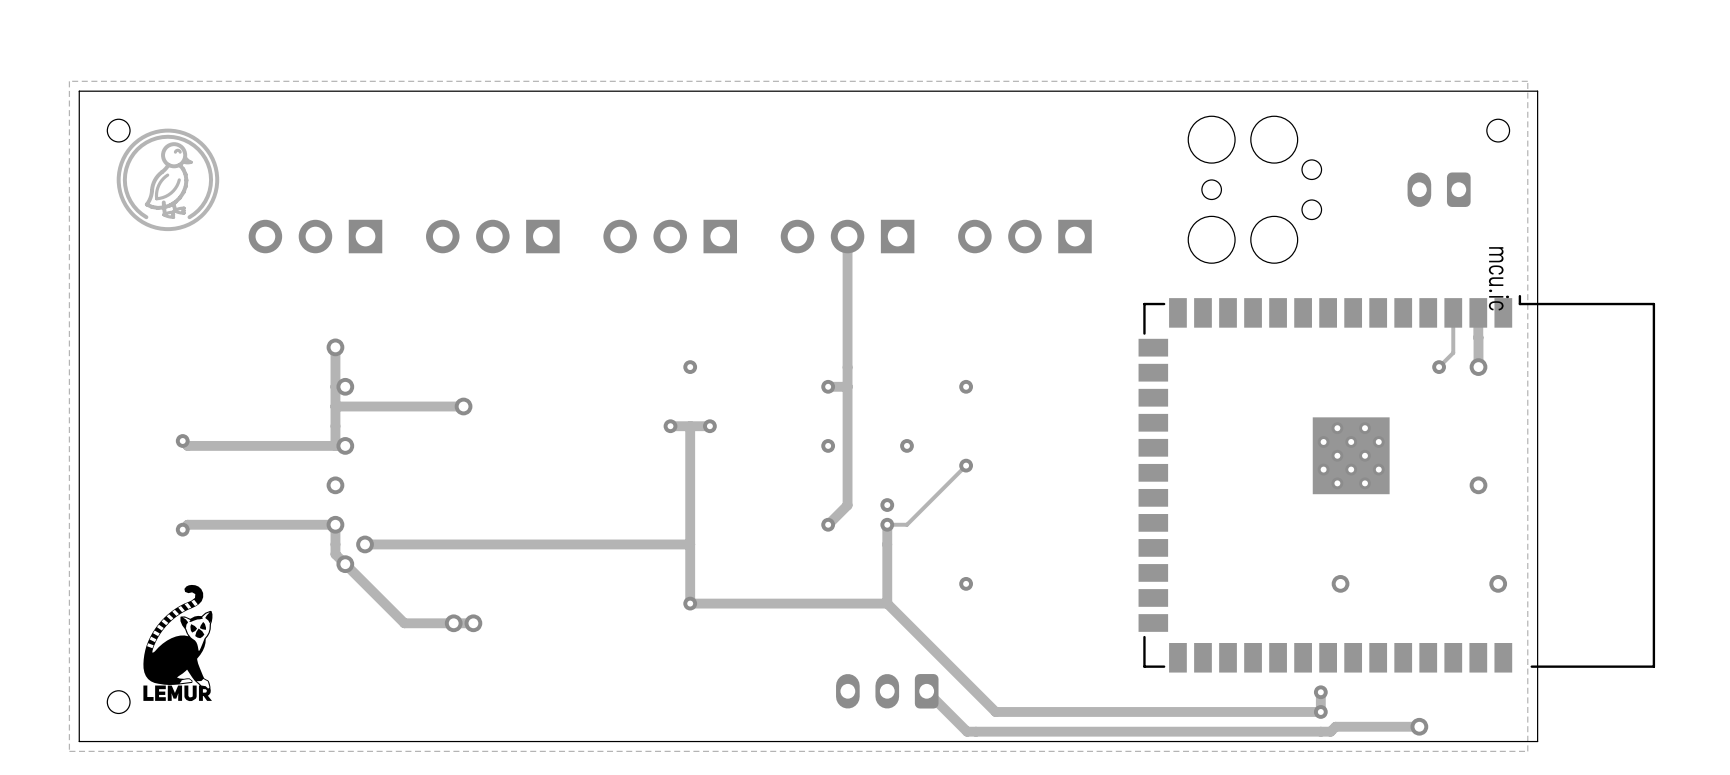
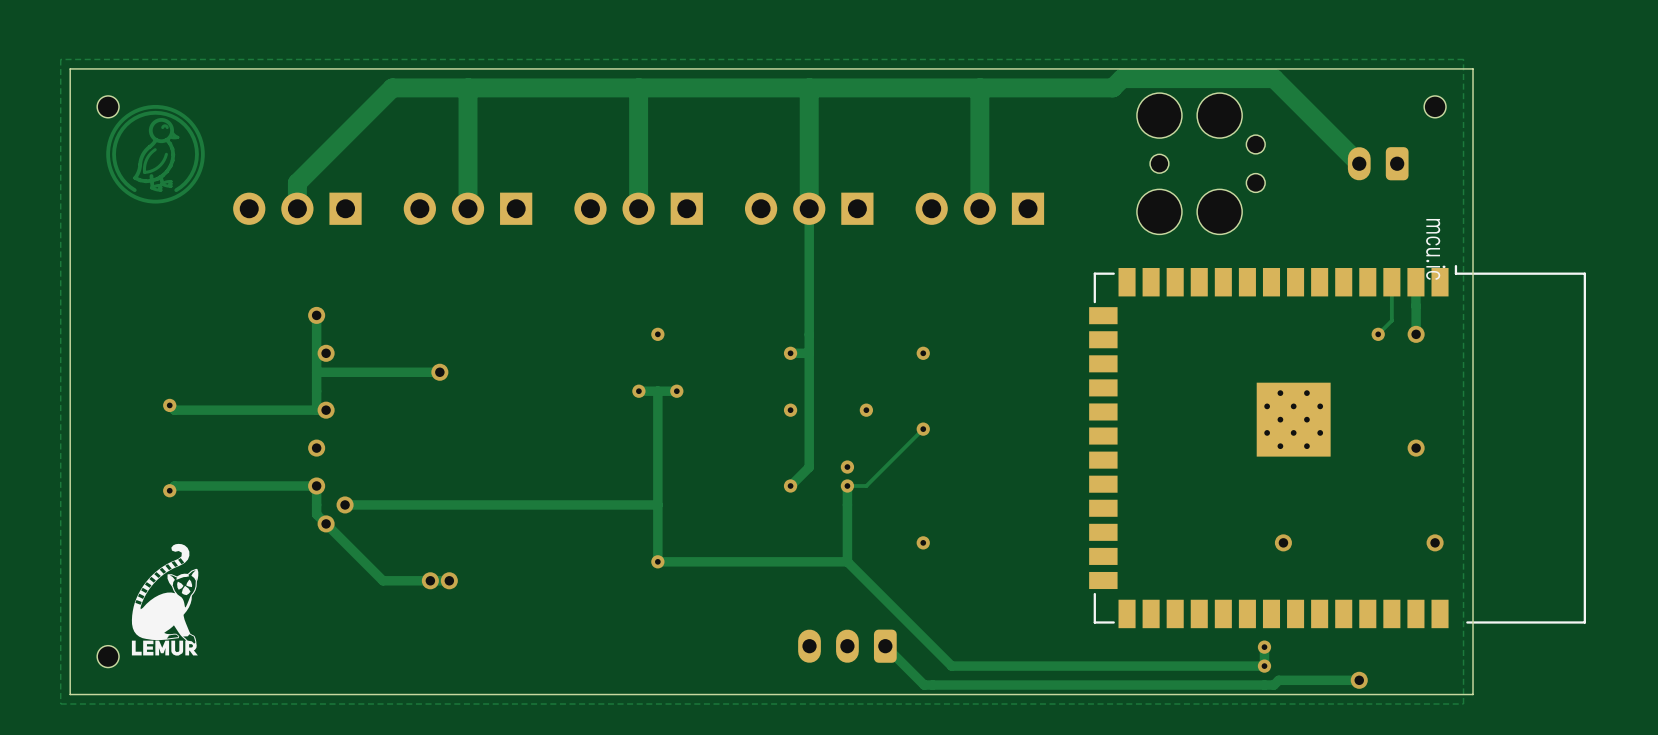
track: none -> (468, 87) (468, 208)
track: none -> (638, 87) (638, 208)
track: none -> (809, 87) (809, 208)
track: none -> (980, 87) (979, 208)
track: none -> (1359, 163) (1274, 78) (1122, 78) (1112, 87) (392, 87) (297, 182) (297, 208)

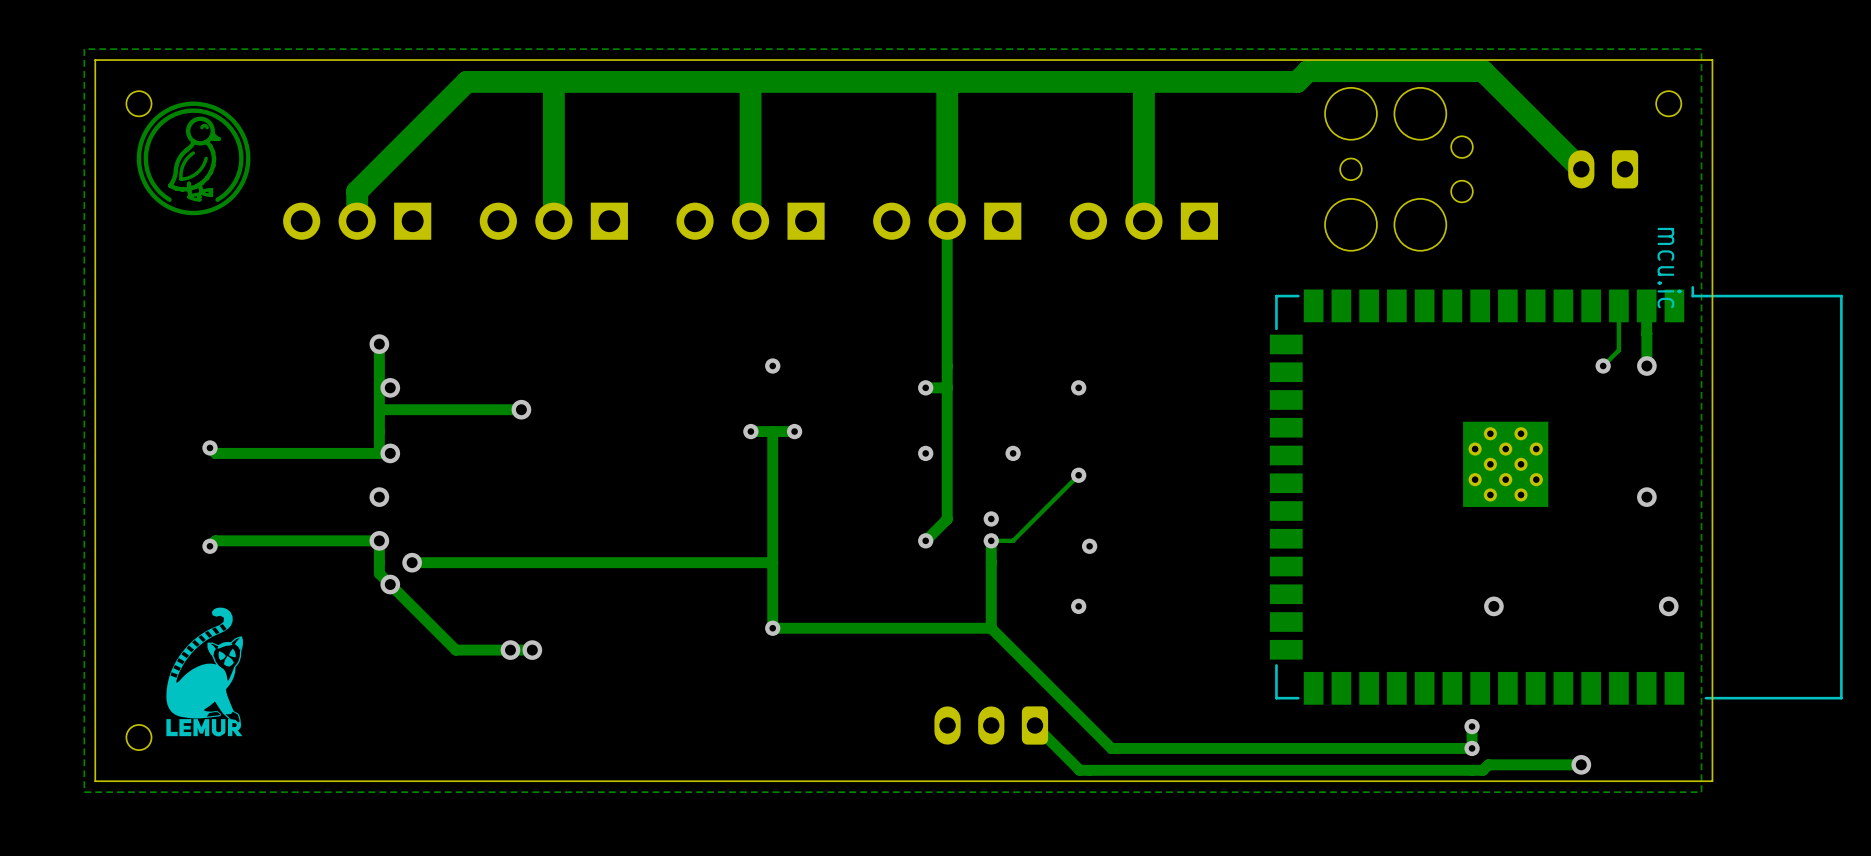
via: none -> (1089, 546)

